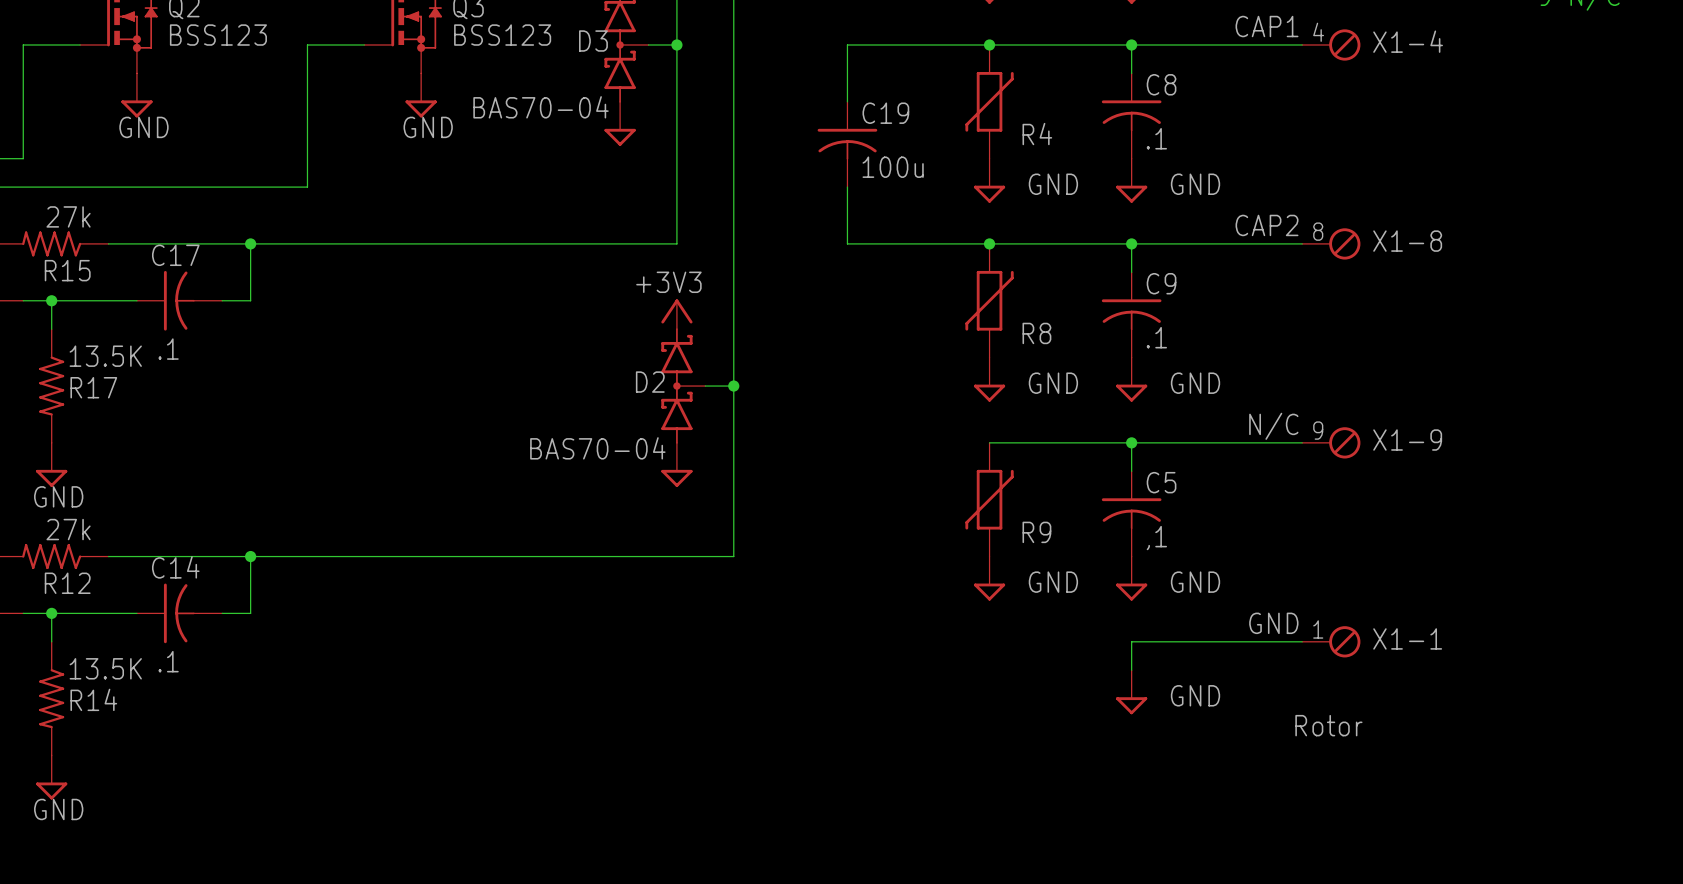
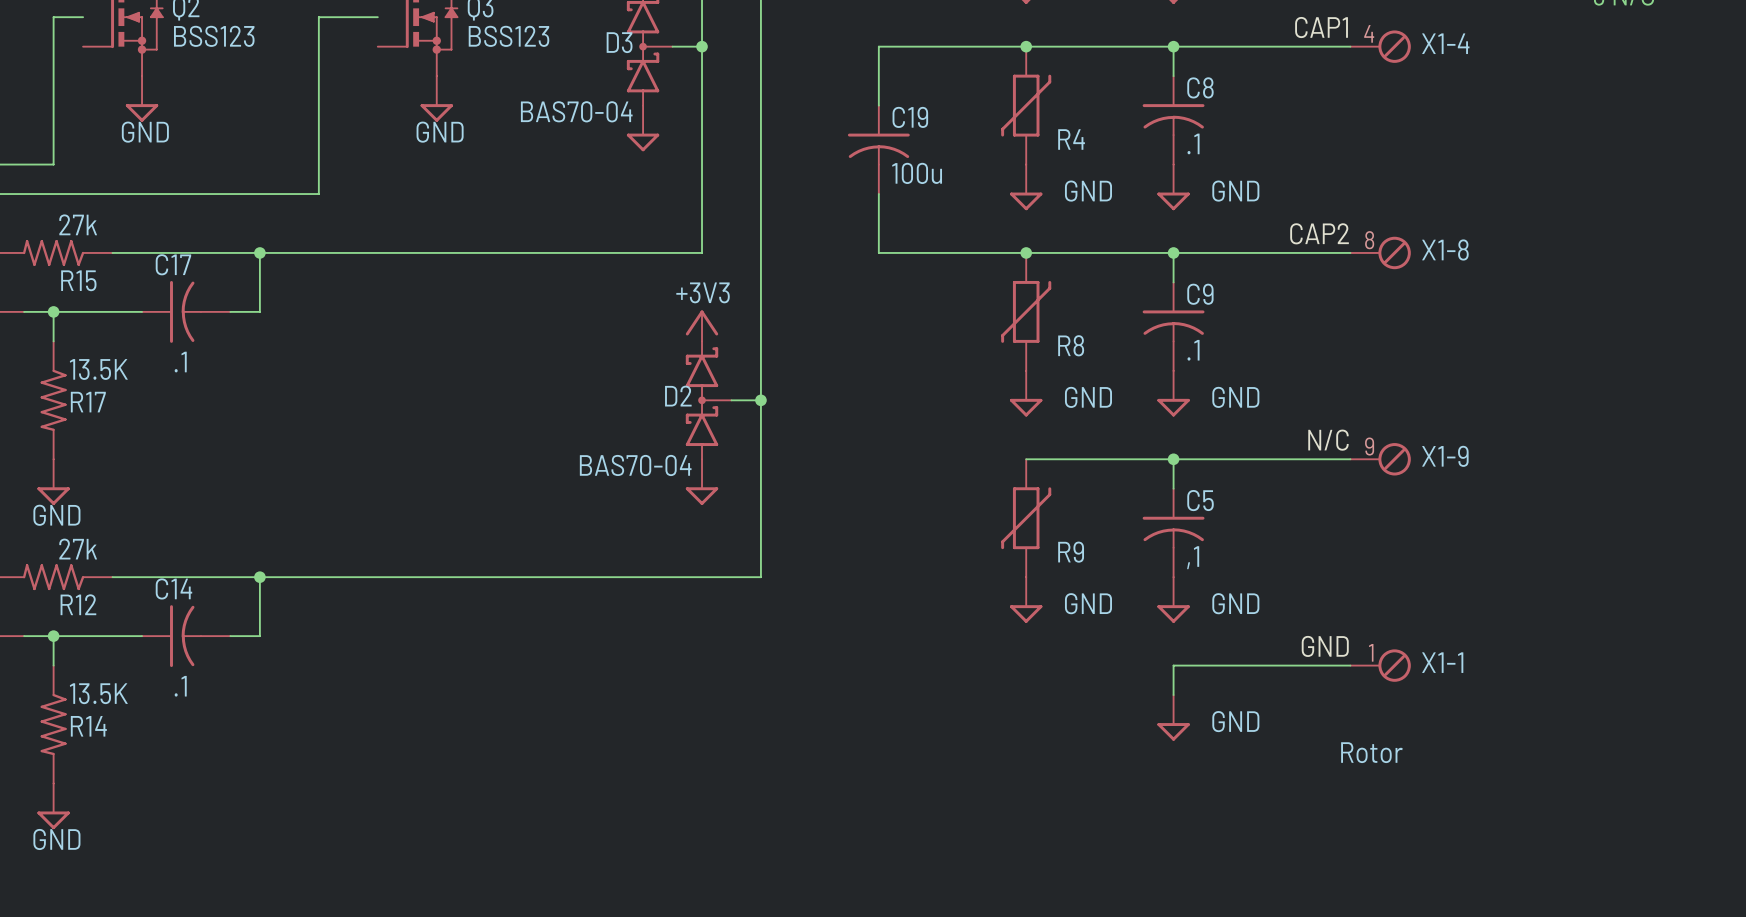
wire: (80, 44) (23, 44) (23, 158) -> (83, 17) (53, 17) (53, 164) (24, 164)
wire: (307, 44) (364, 44) -> (318, 46) (318, 17) (377, 17)

